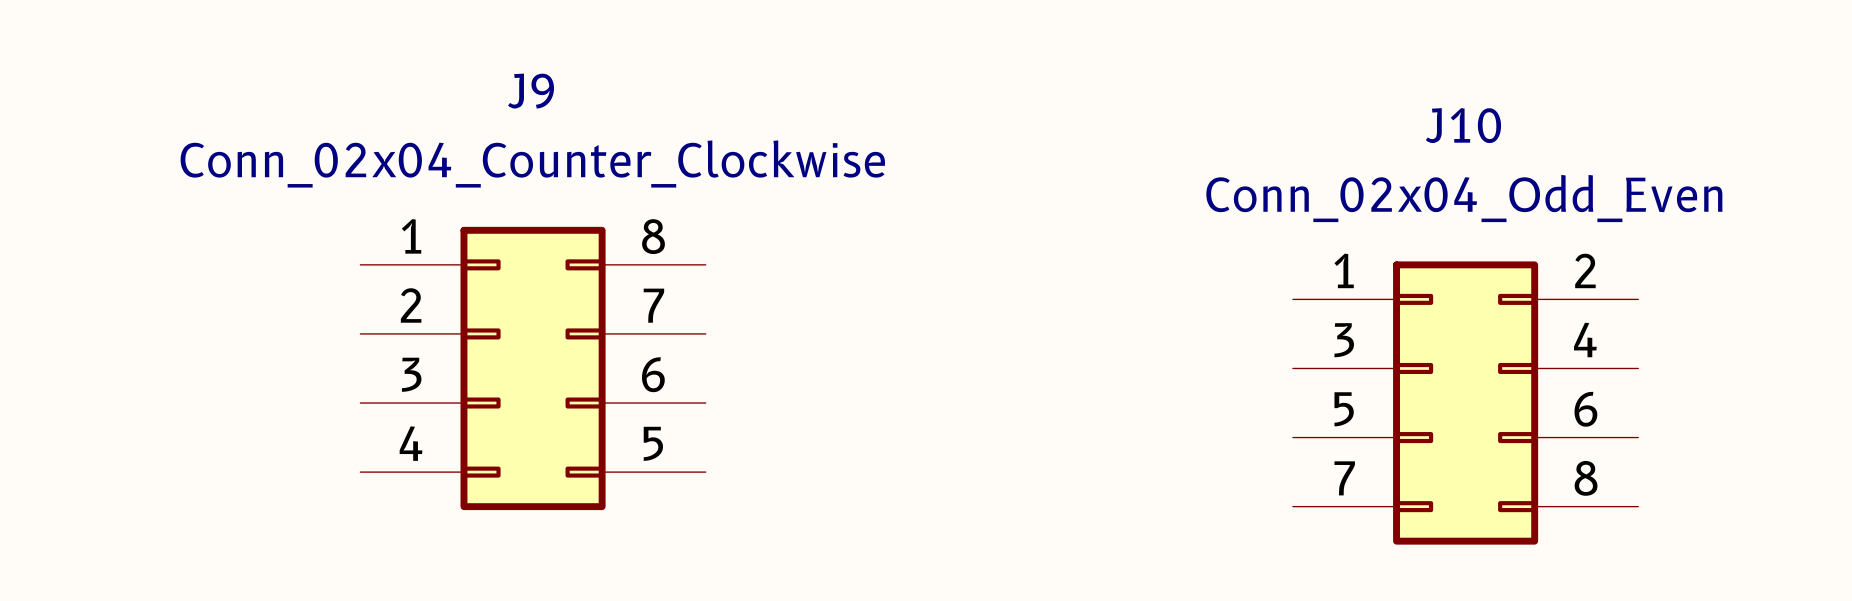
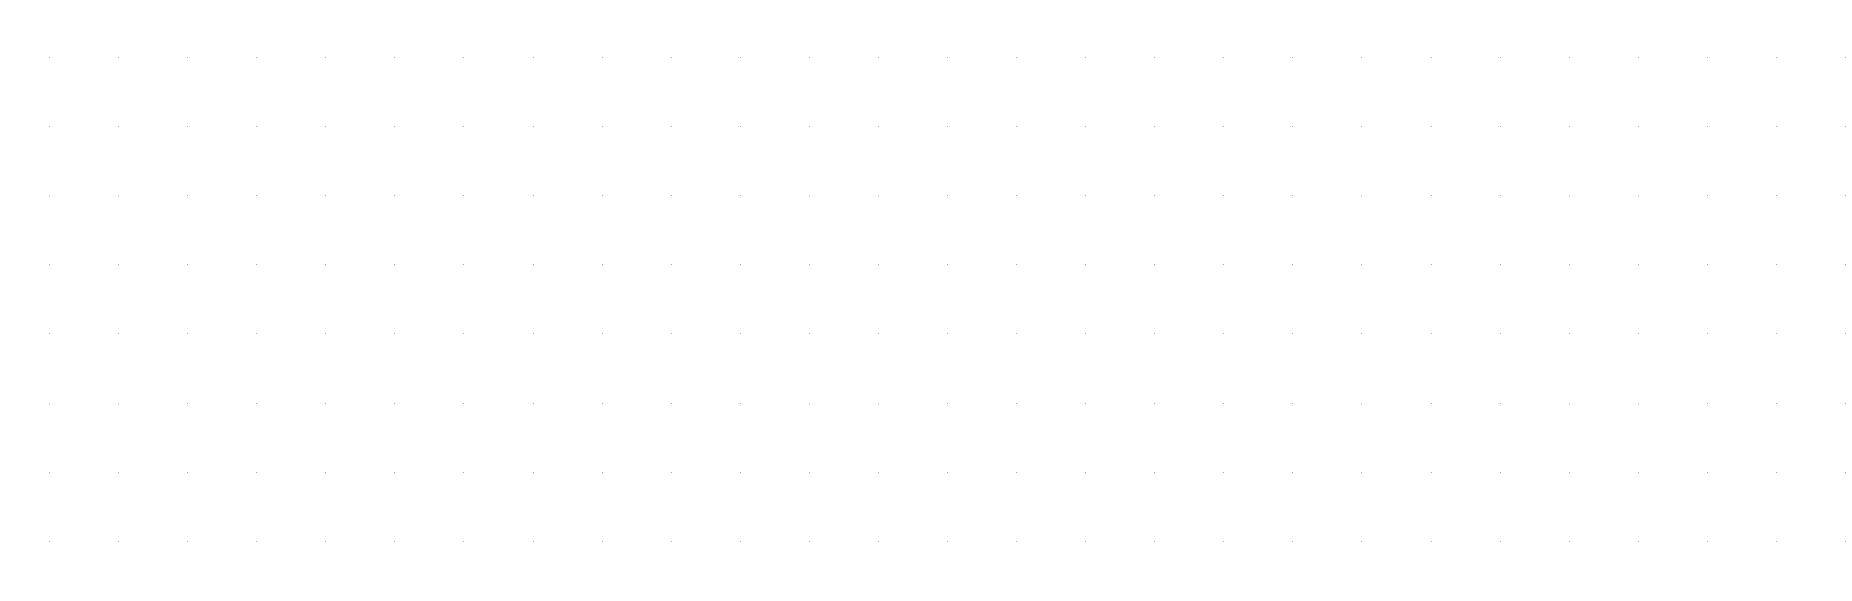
J9: Conn_02x04_Counter_Clockwise (533, 368) -> none
J10: Conn_02x04_Odd_Even (1465, 403) -> none

